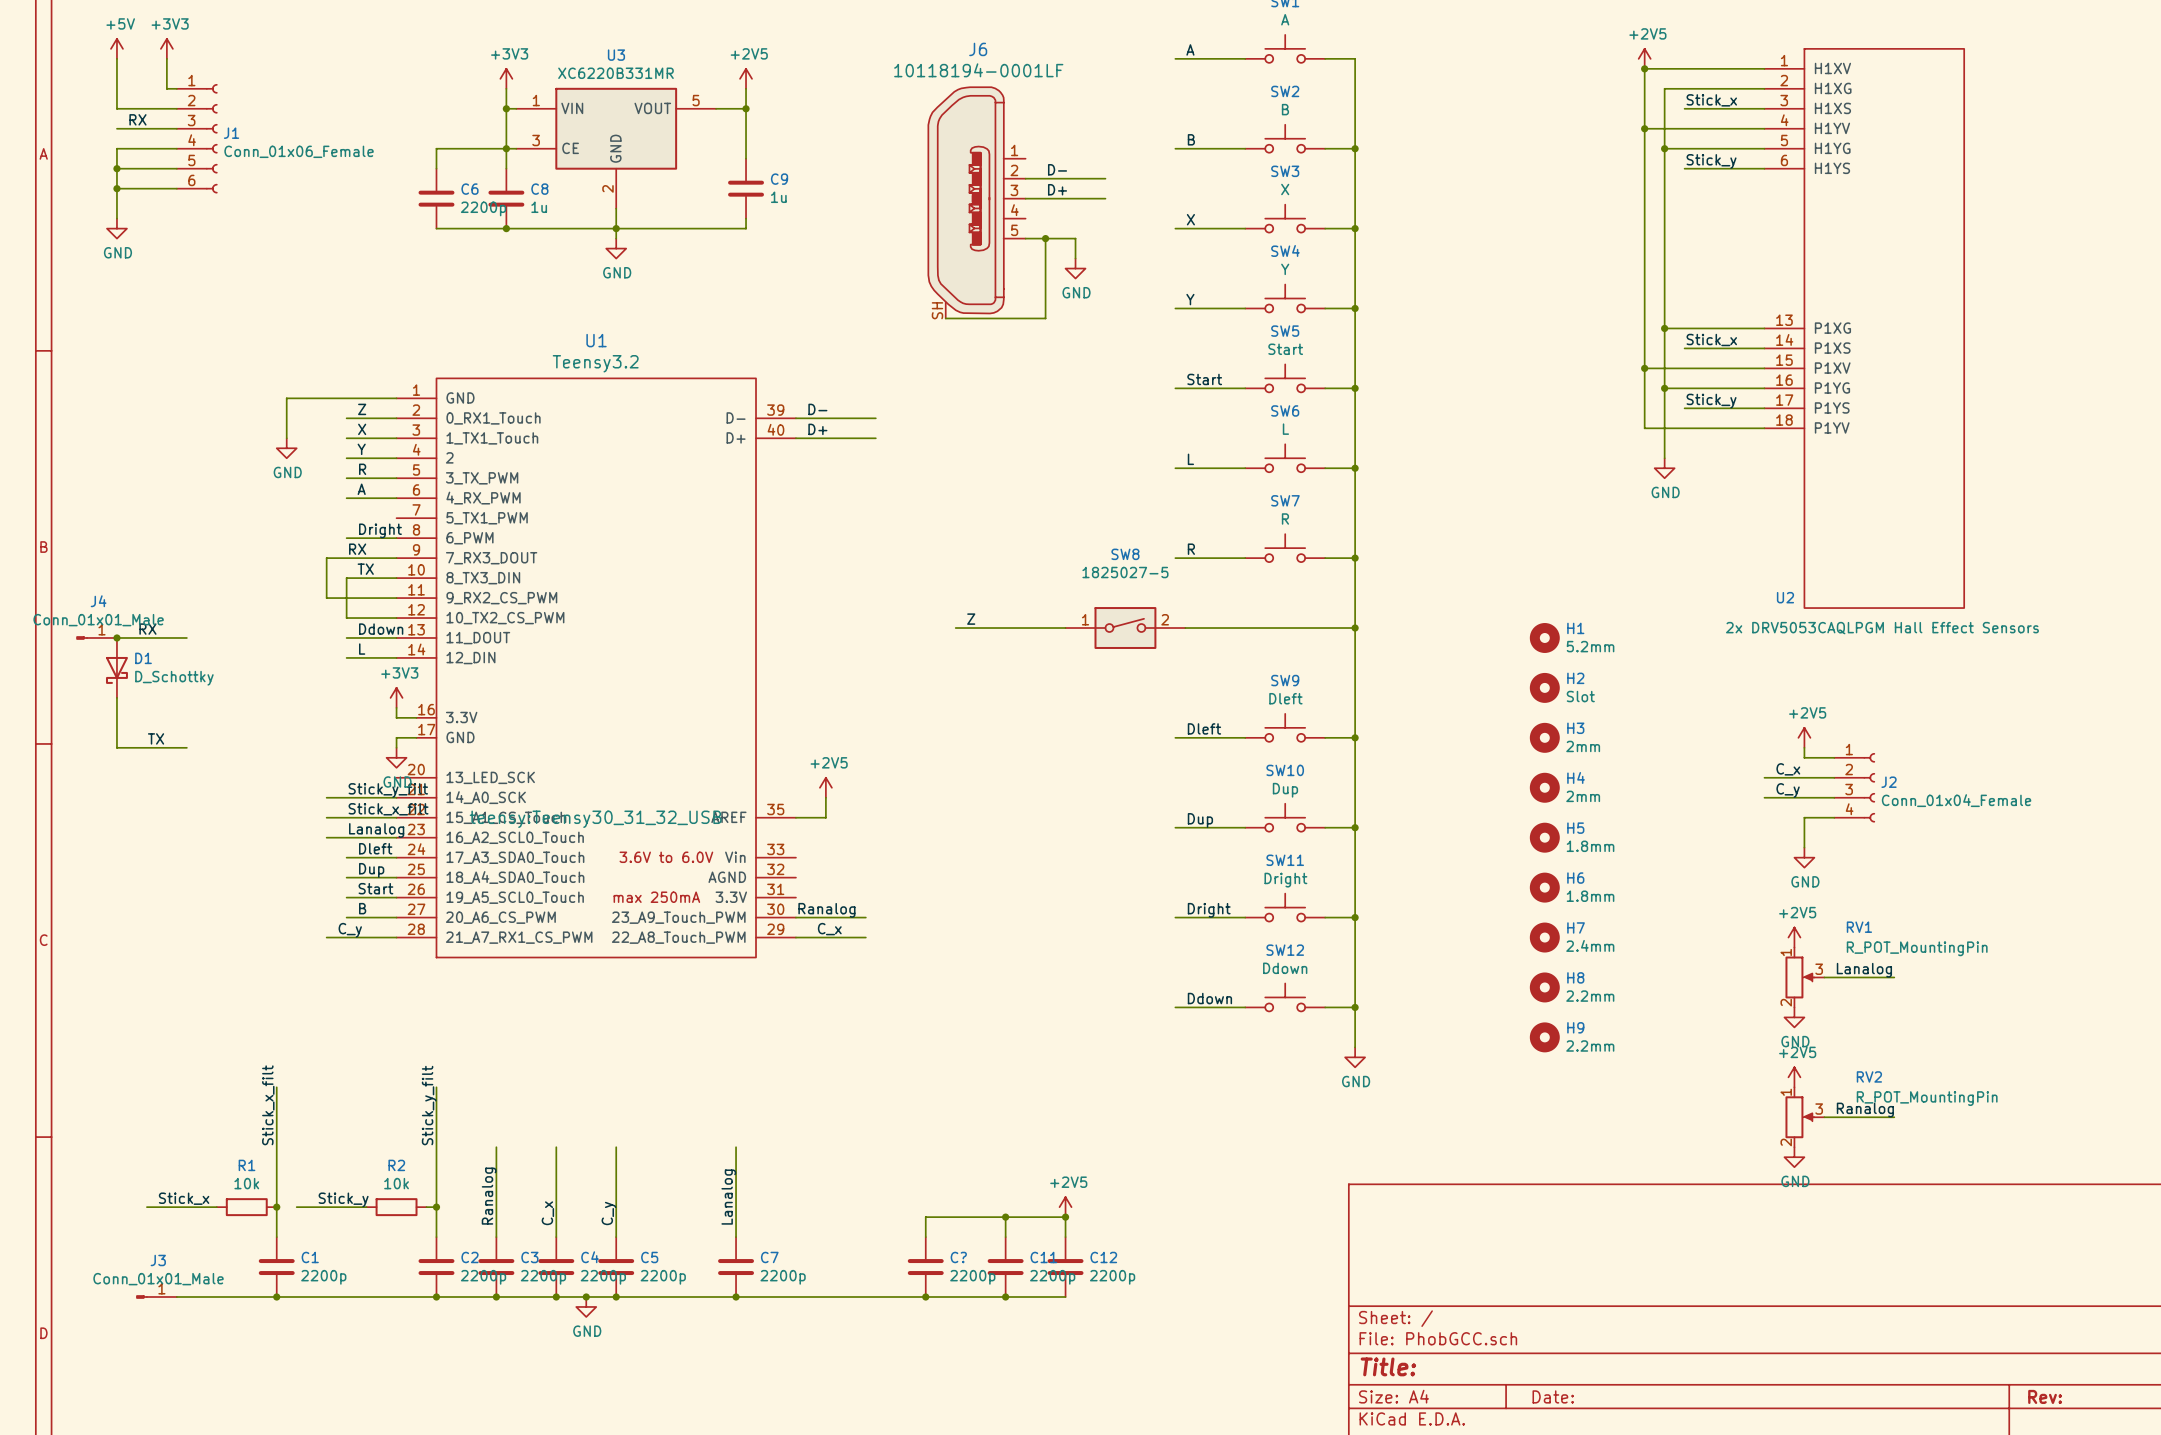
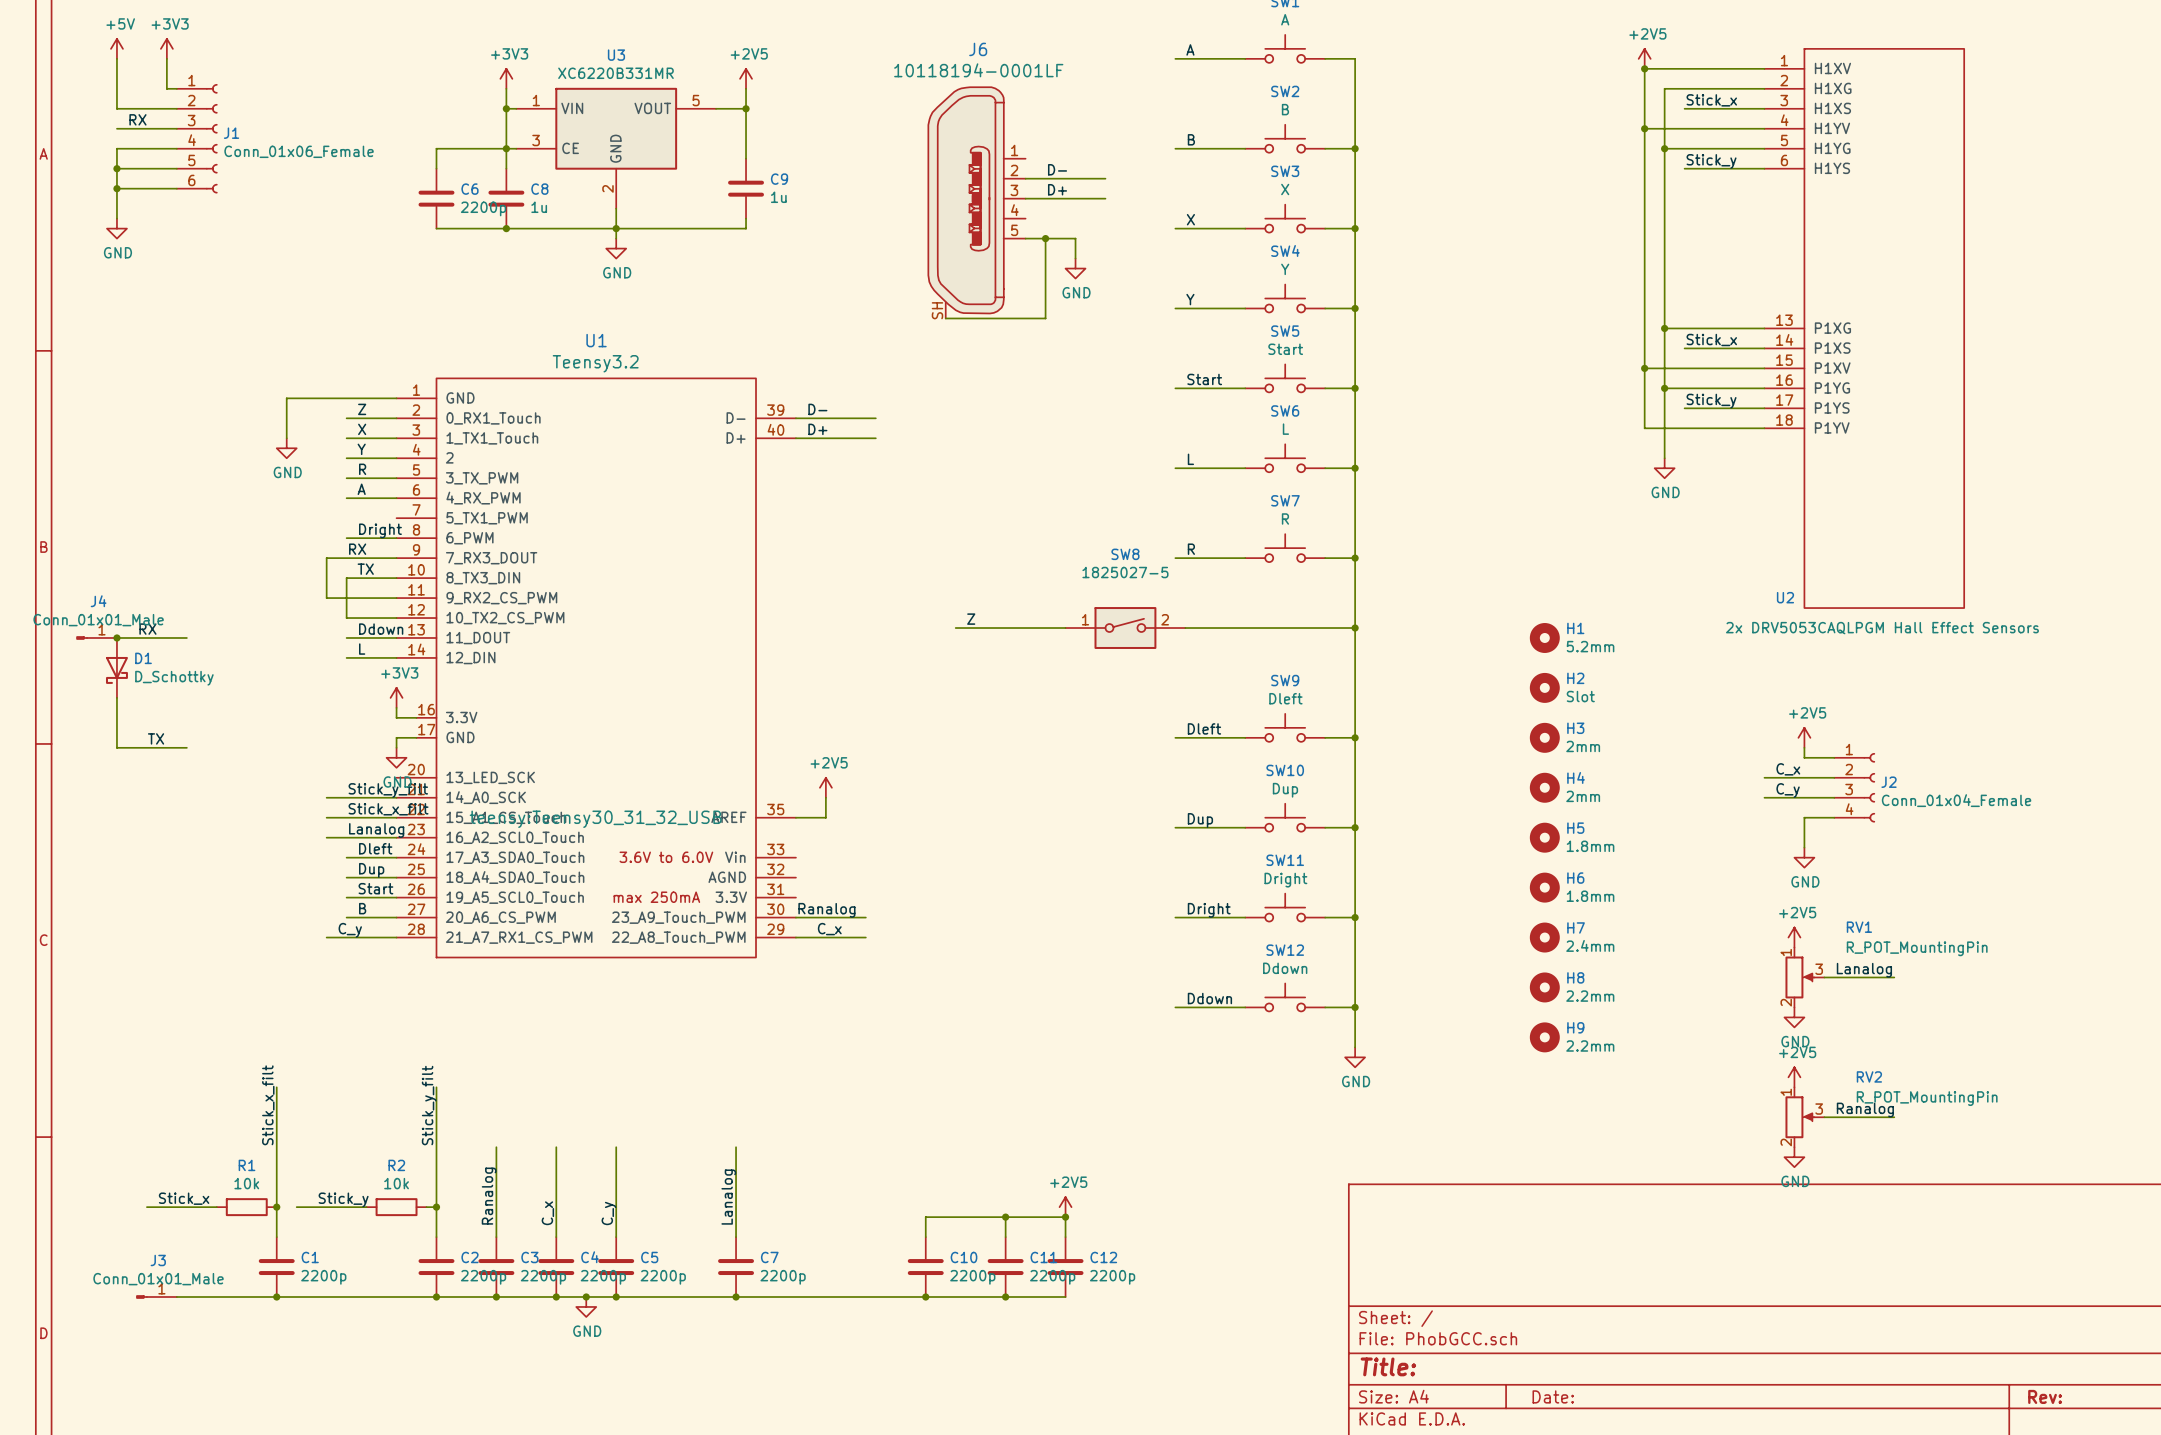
C? name: C? (958, 1257) -> C10 (964, 1257)

